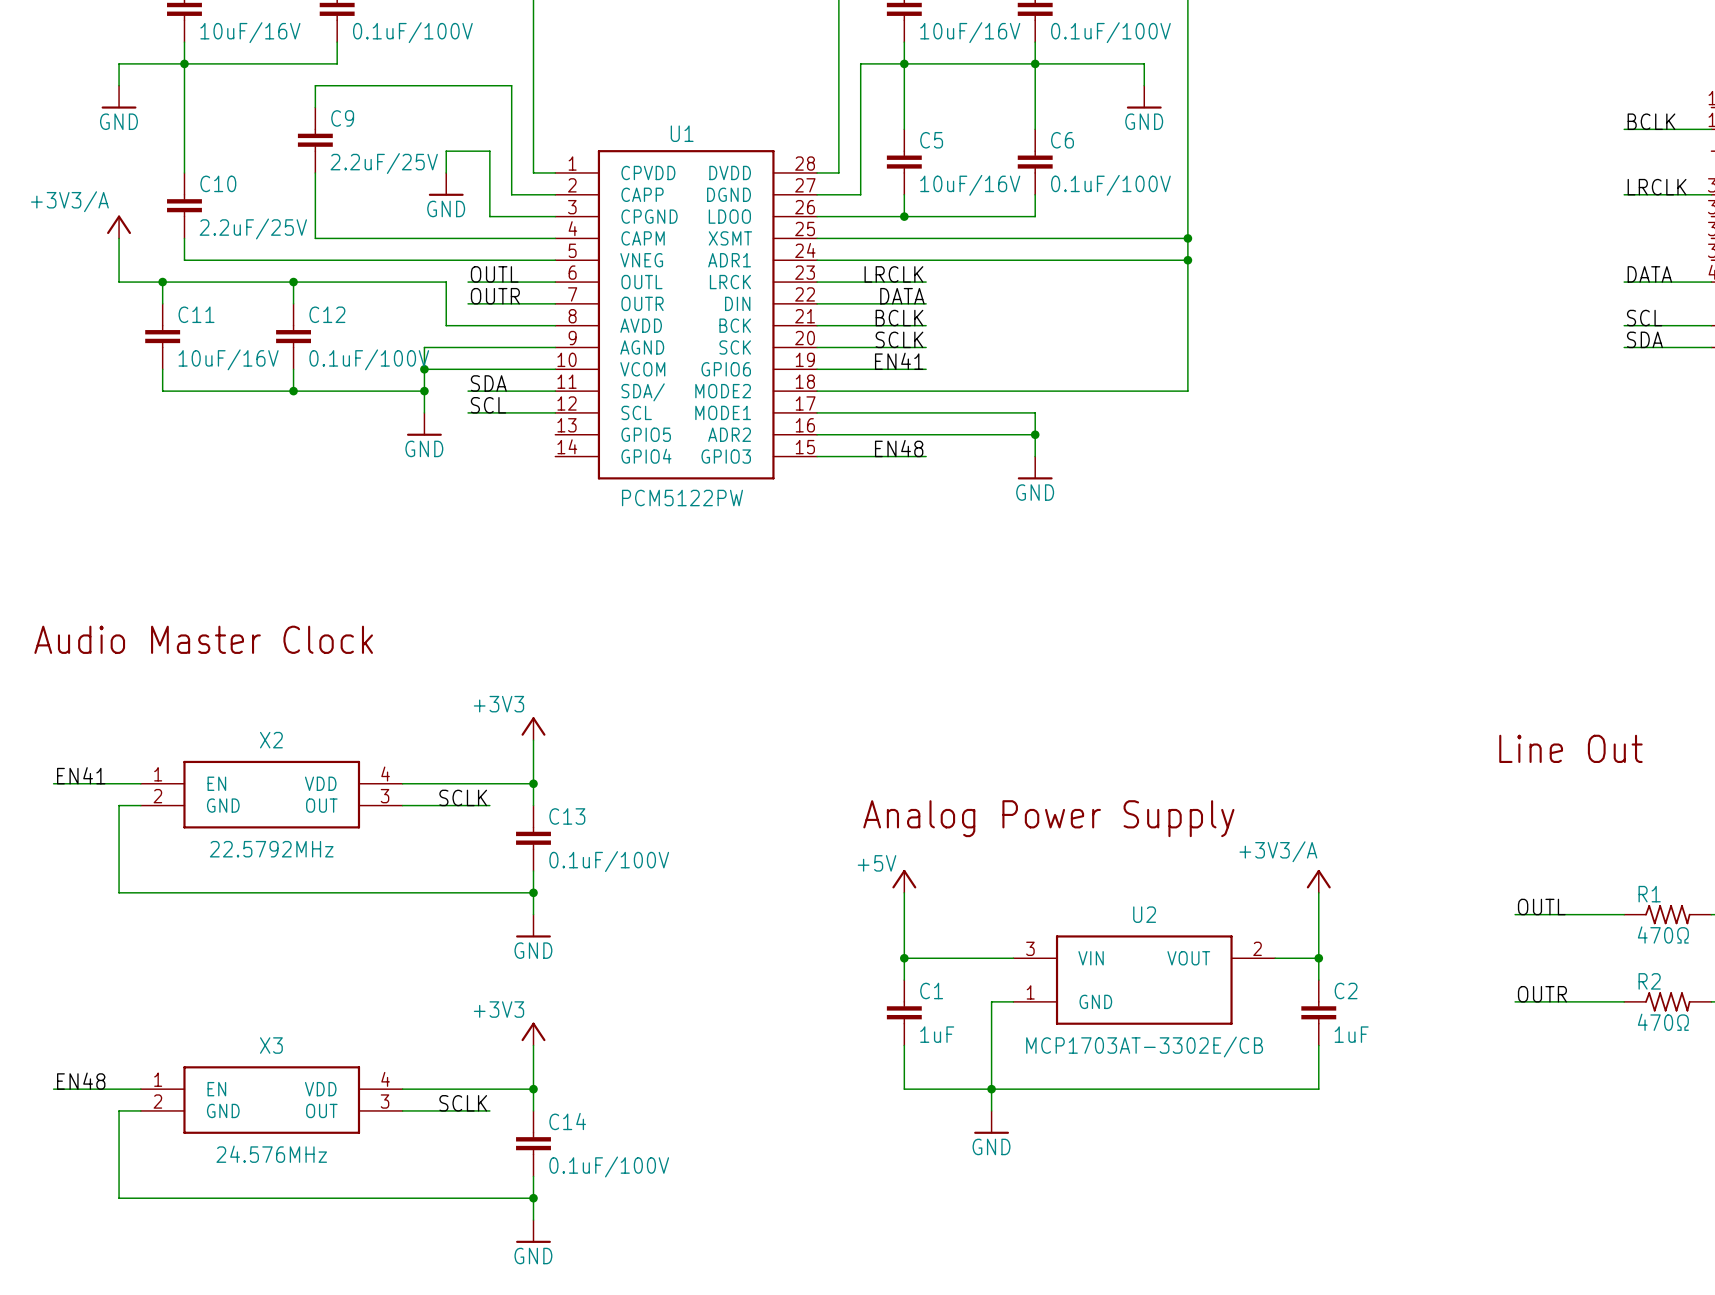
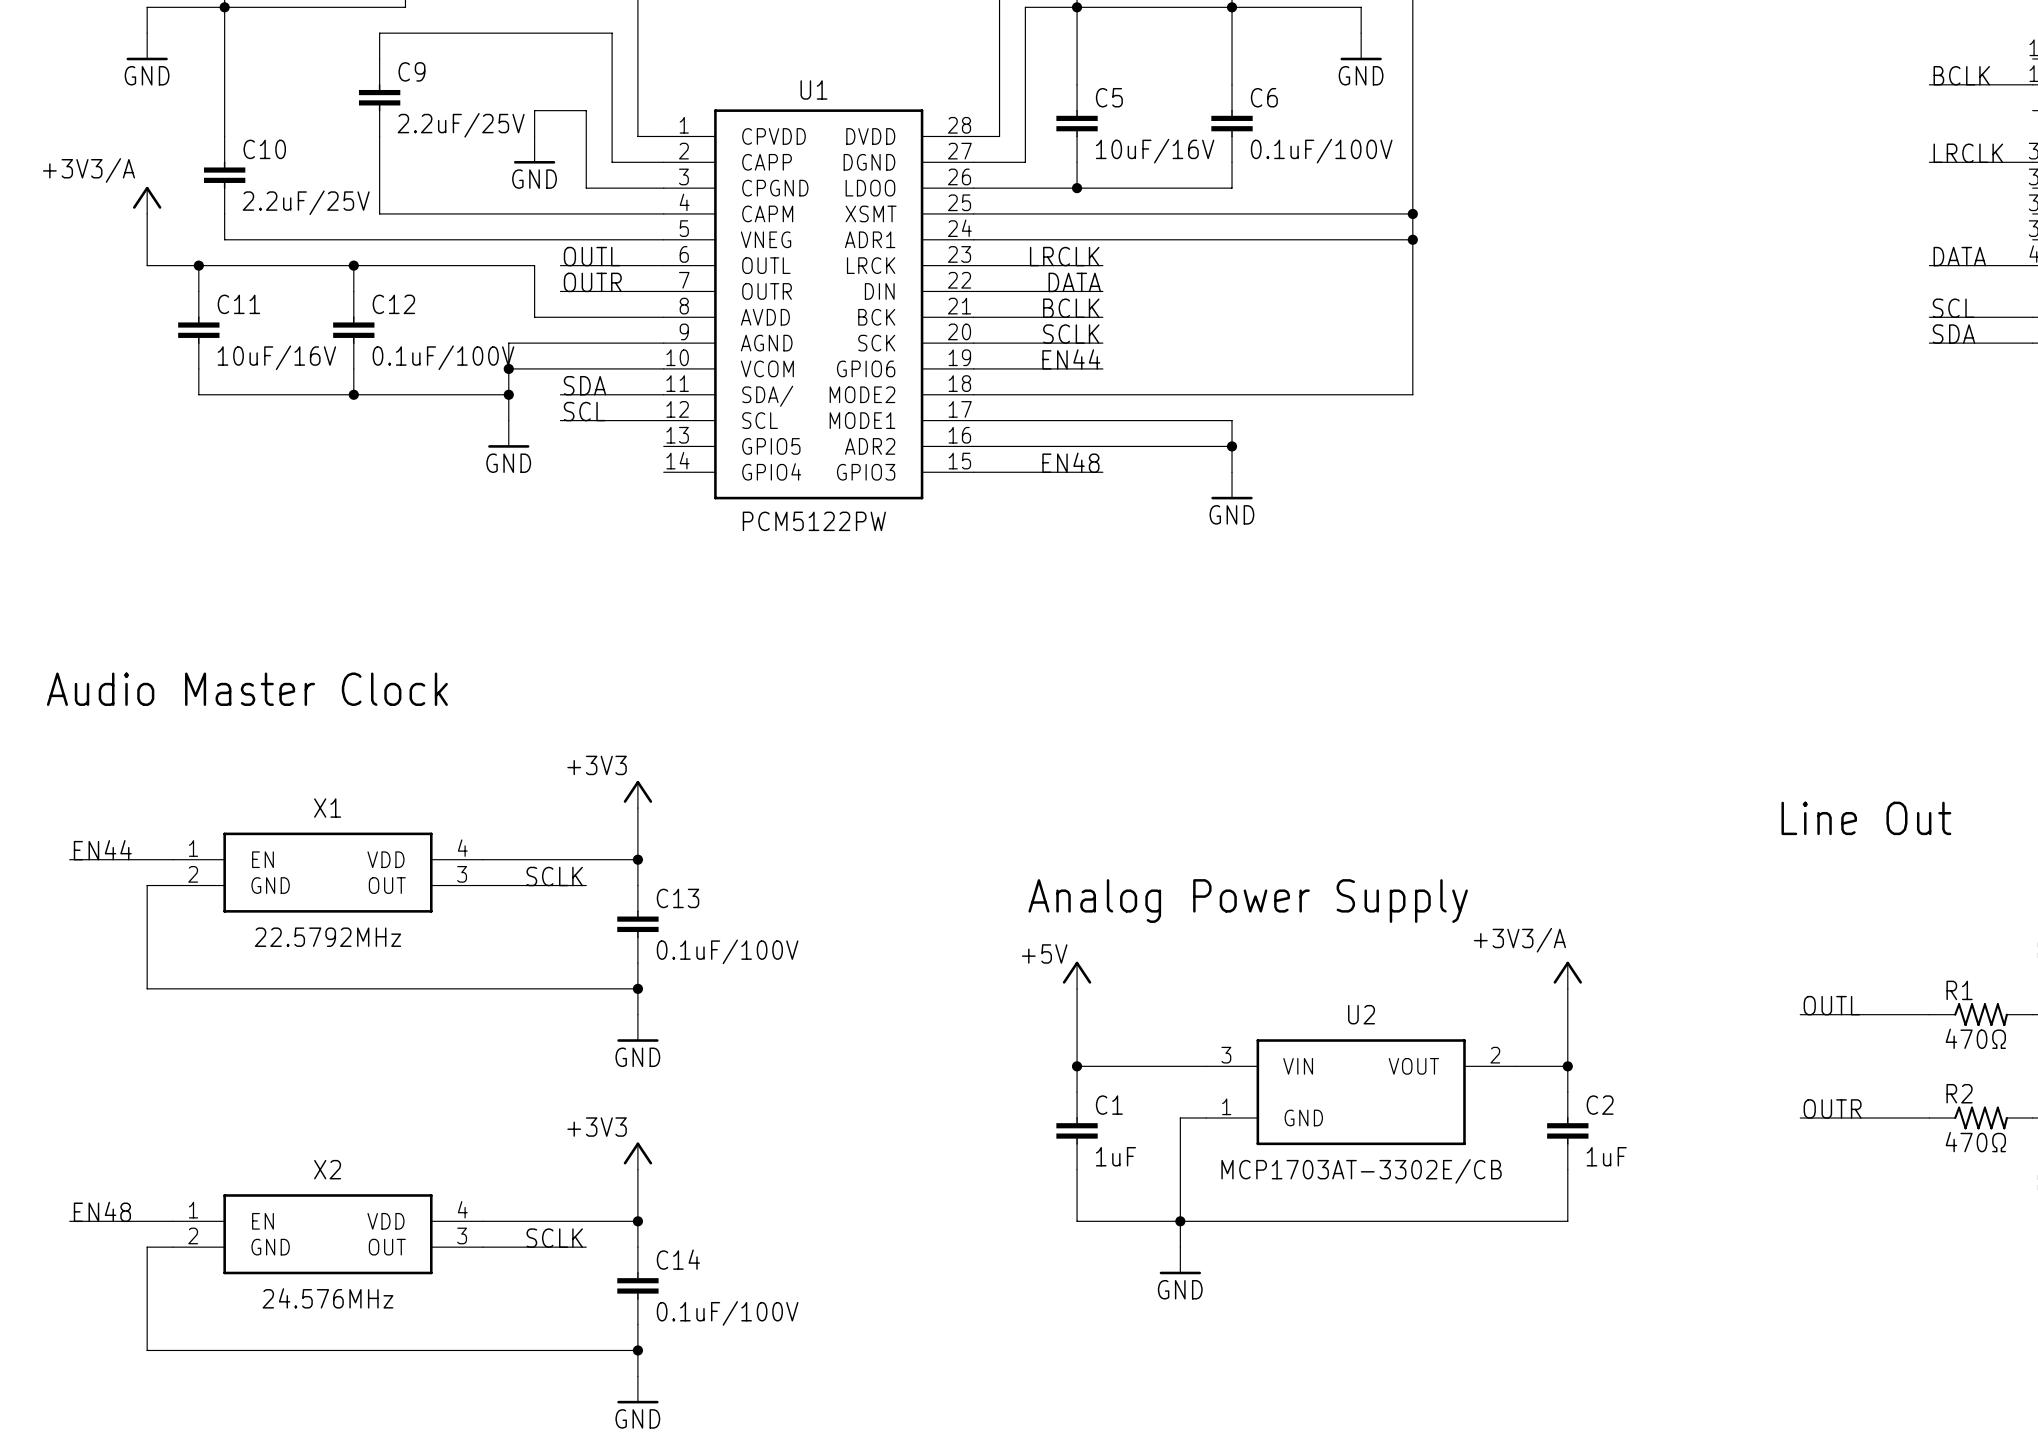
label: EN41 (899, 361) -> EN44 (1071, 359)
X2 name: X2 (271, 740) -> X1 (327, 808)
label: EN41 (81, 775) -> EN44 (102, 850)
X3 name: X3 (271, 1045) -> X2 (327, 1169)

